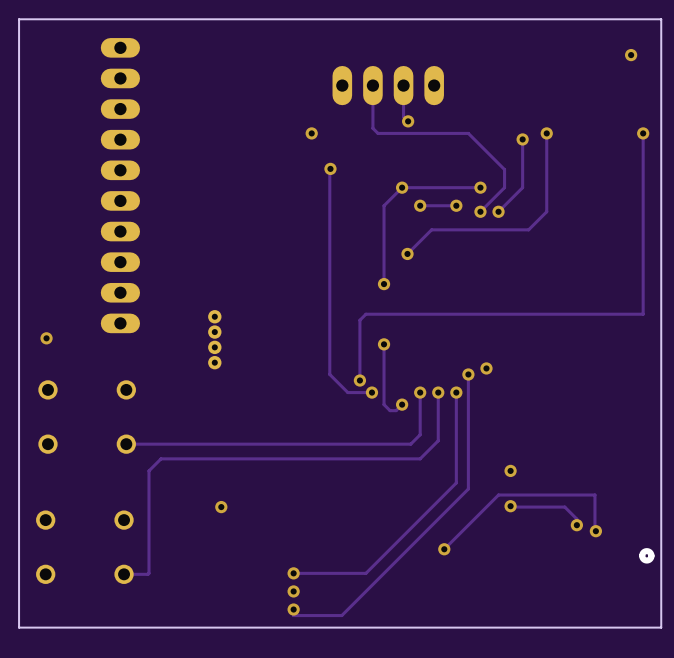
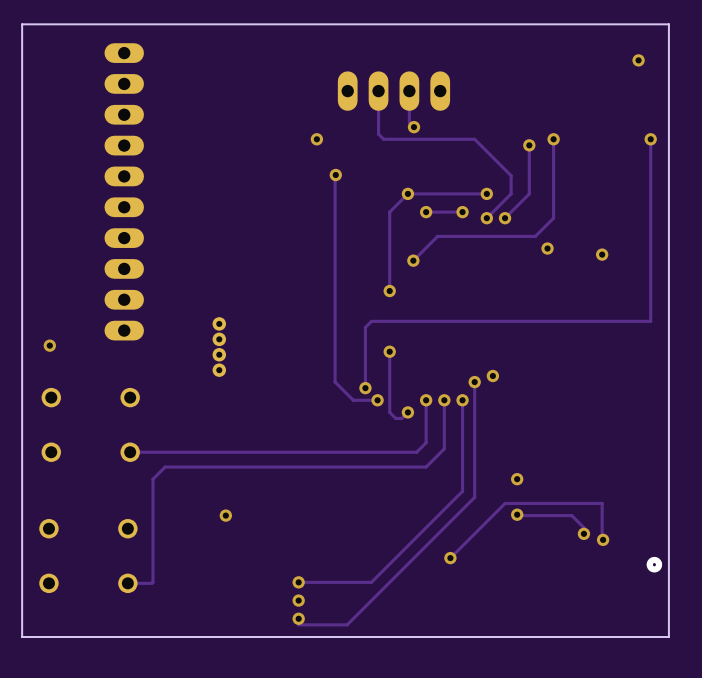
via: none -> (547, 248)
via: none -> (602, 254)

